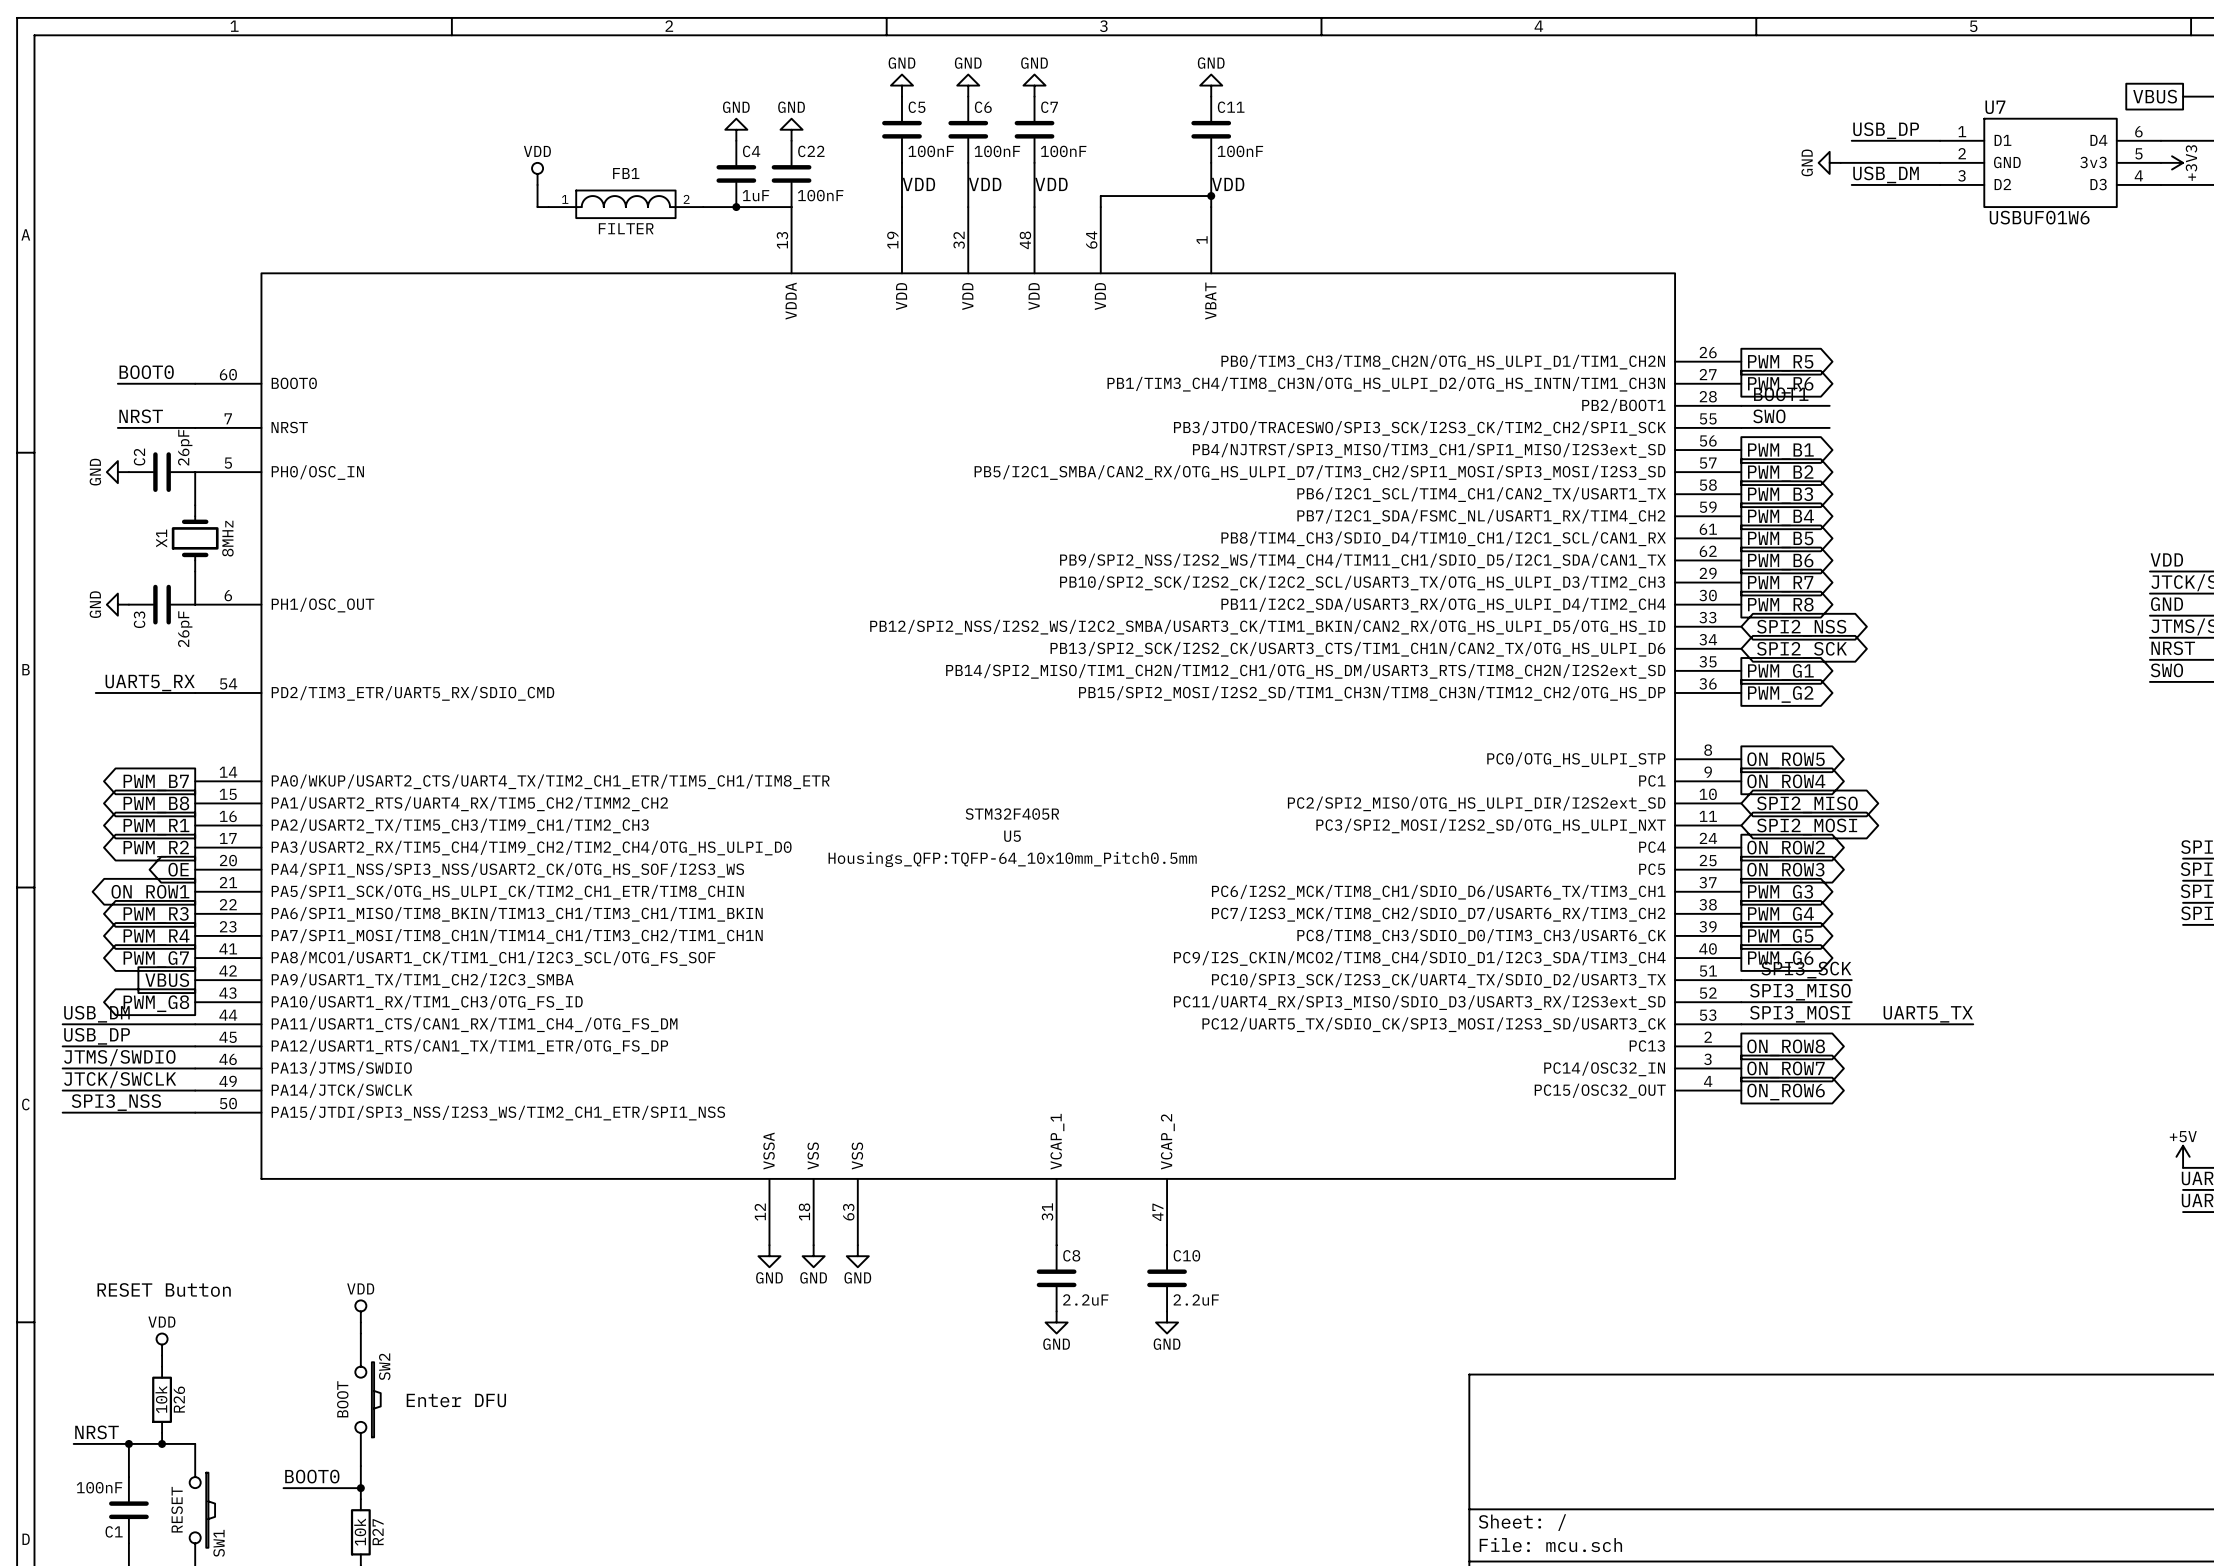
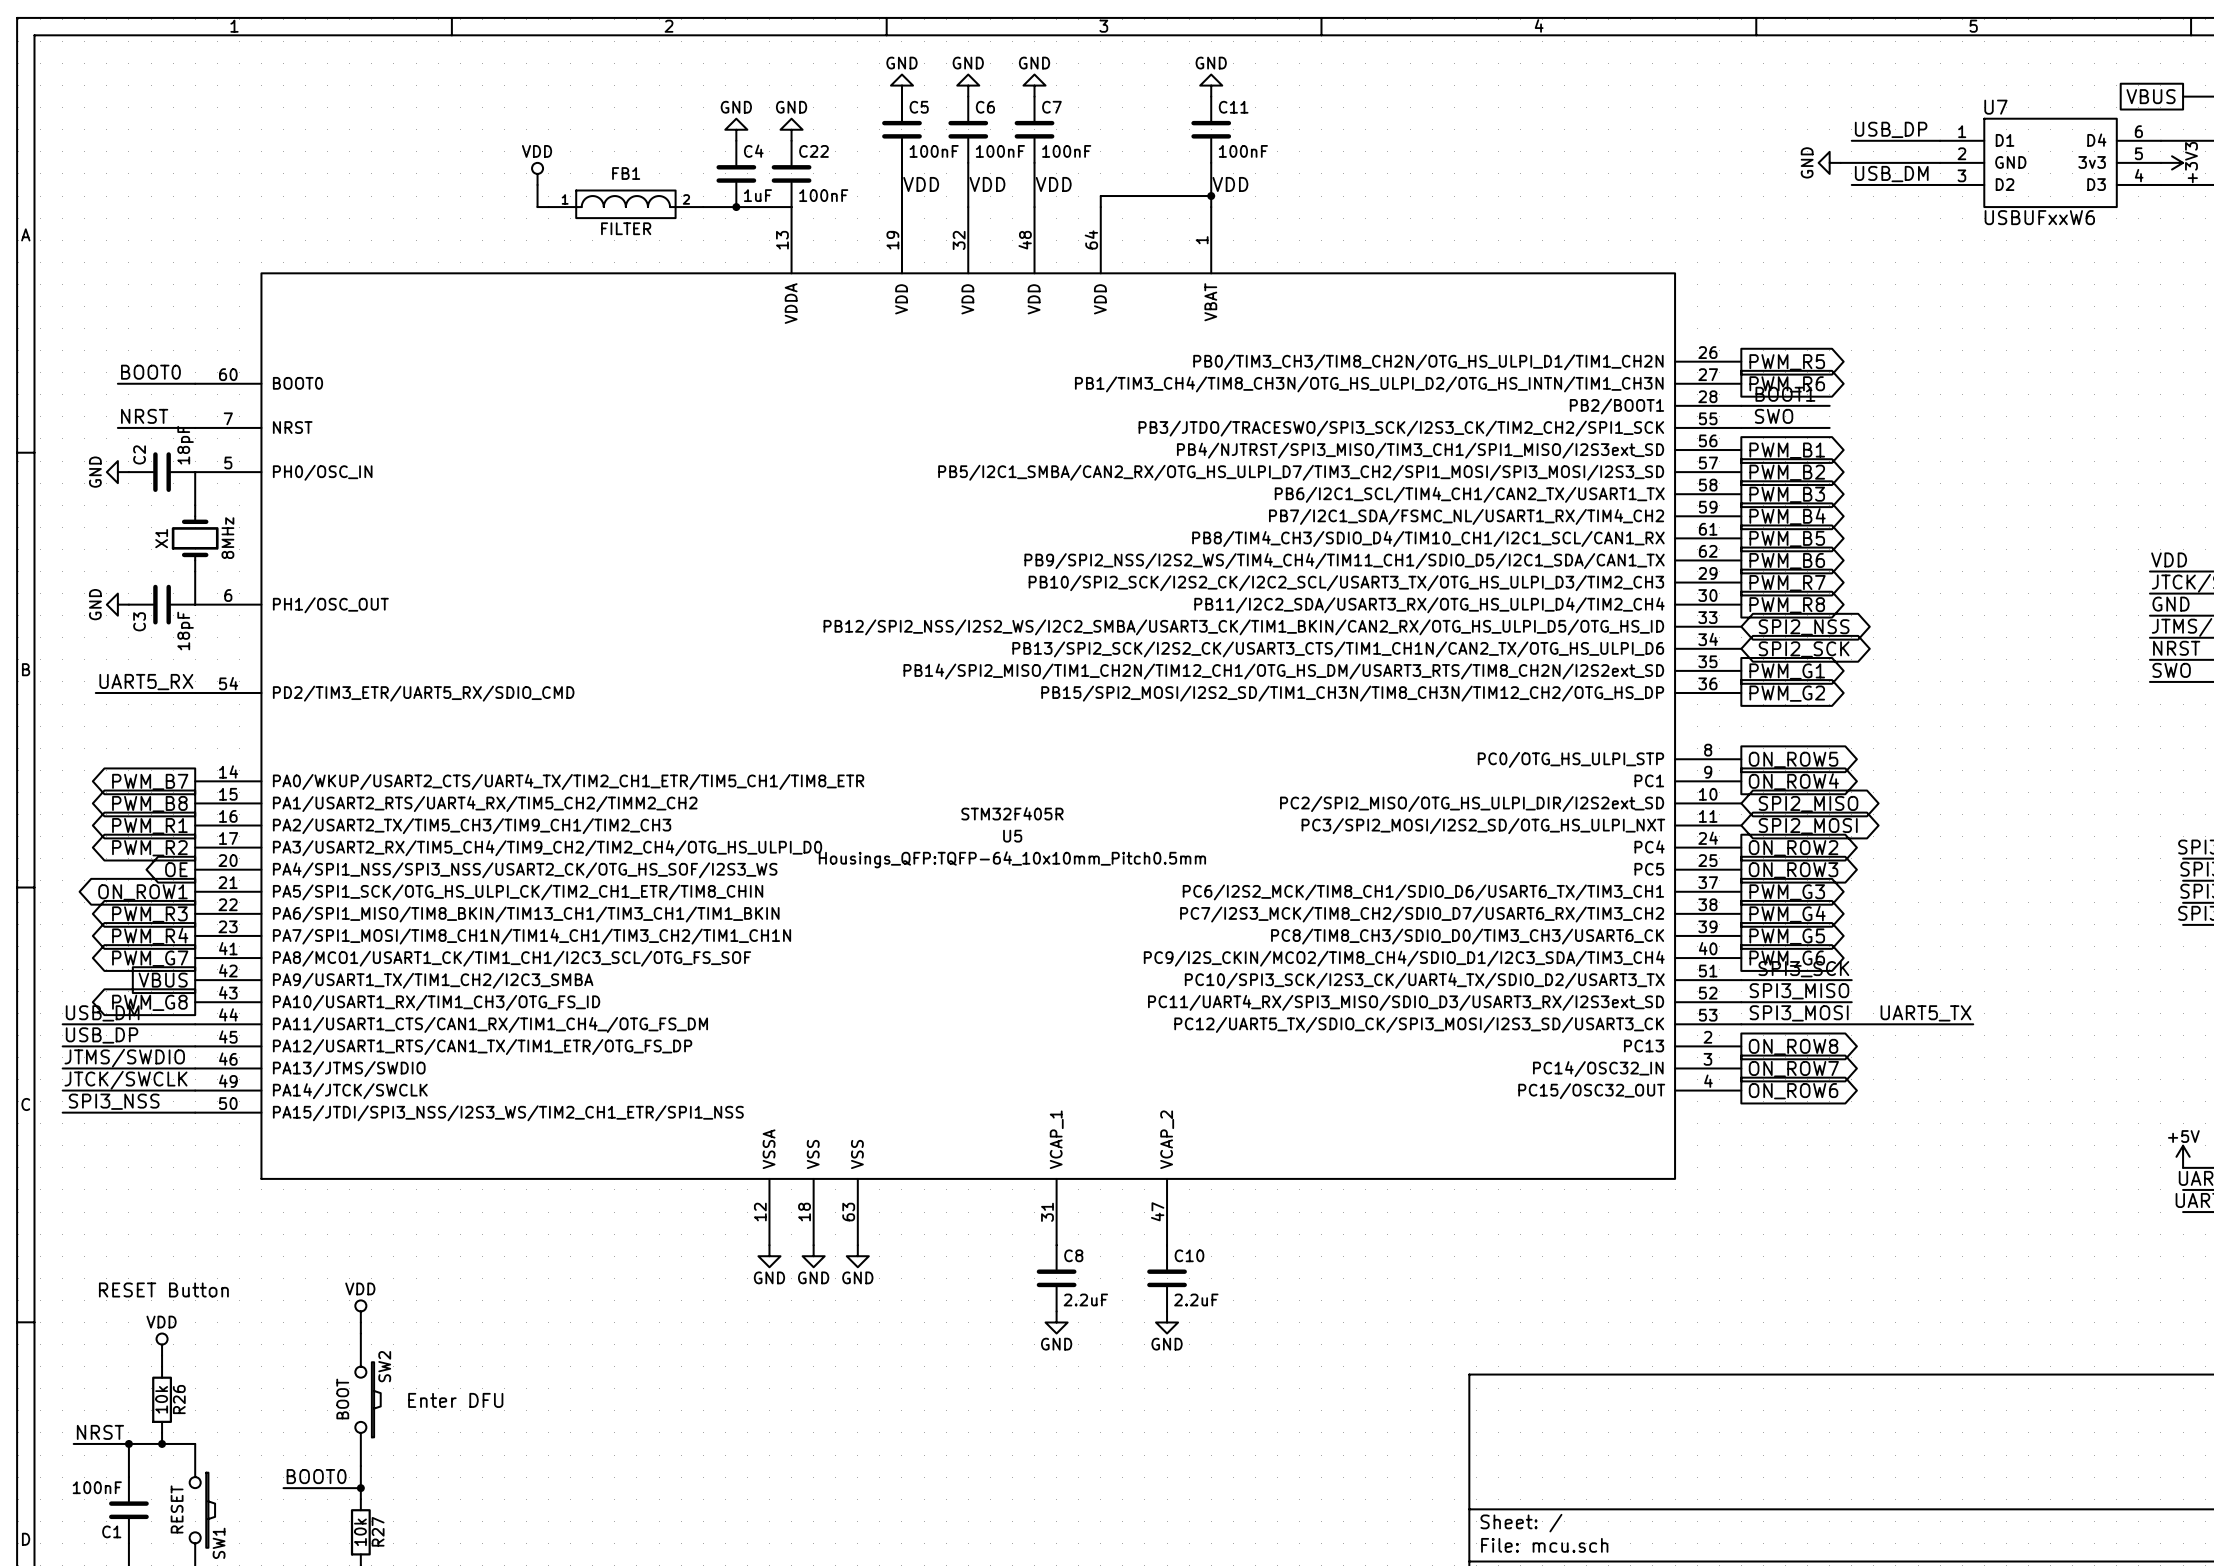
U7 value: USBUF01W6 (2039, 217) -> USBUFxxW6 (2039, 217)
C2 value: 26pF (185, 447) -> 18pF (185, 445)
C3 value: 26pF (185, 629) -> 18pF (185, 631)

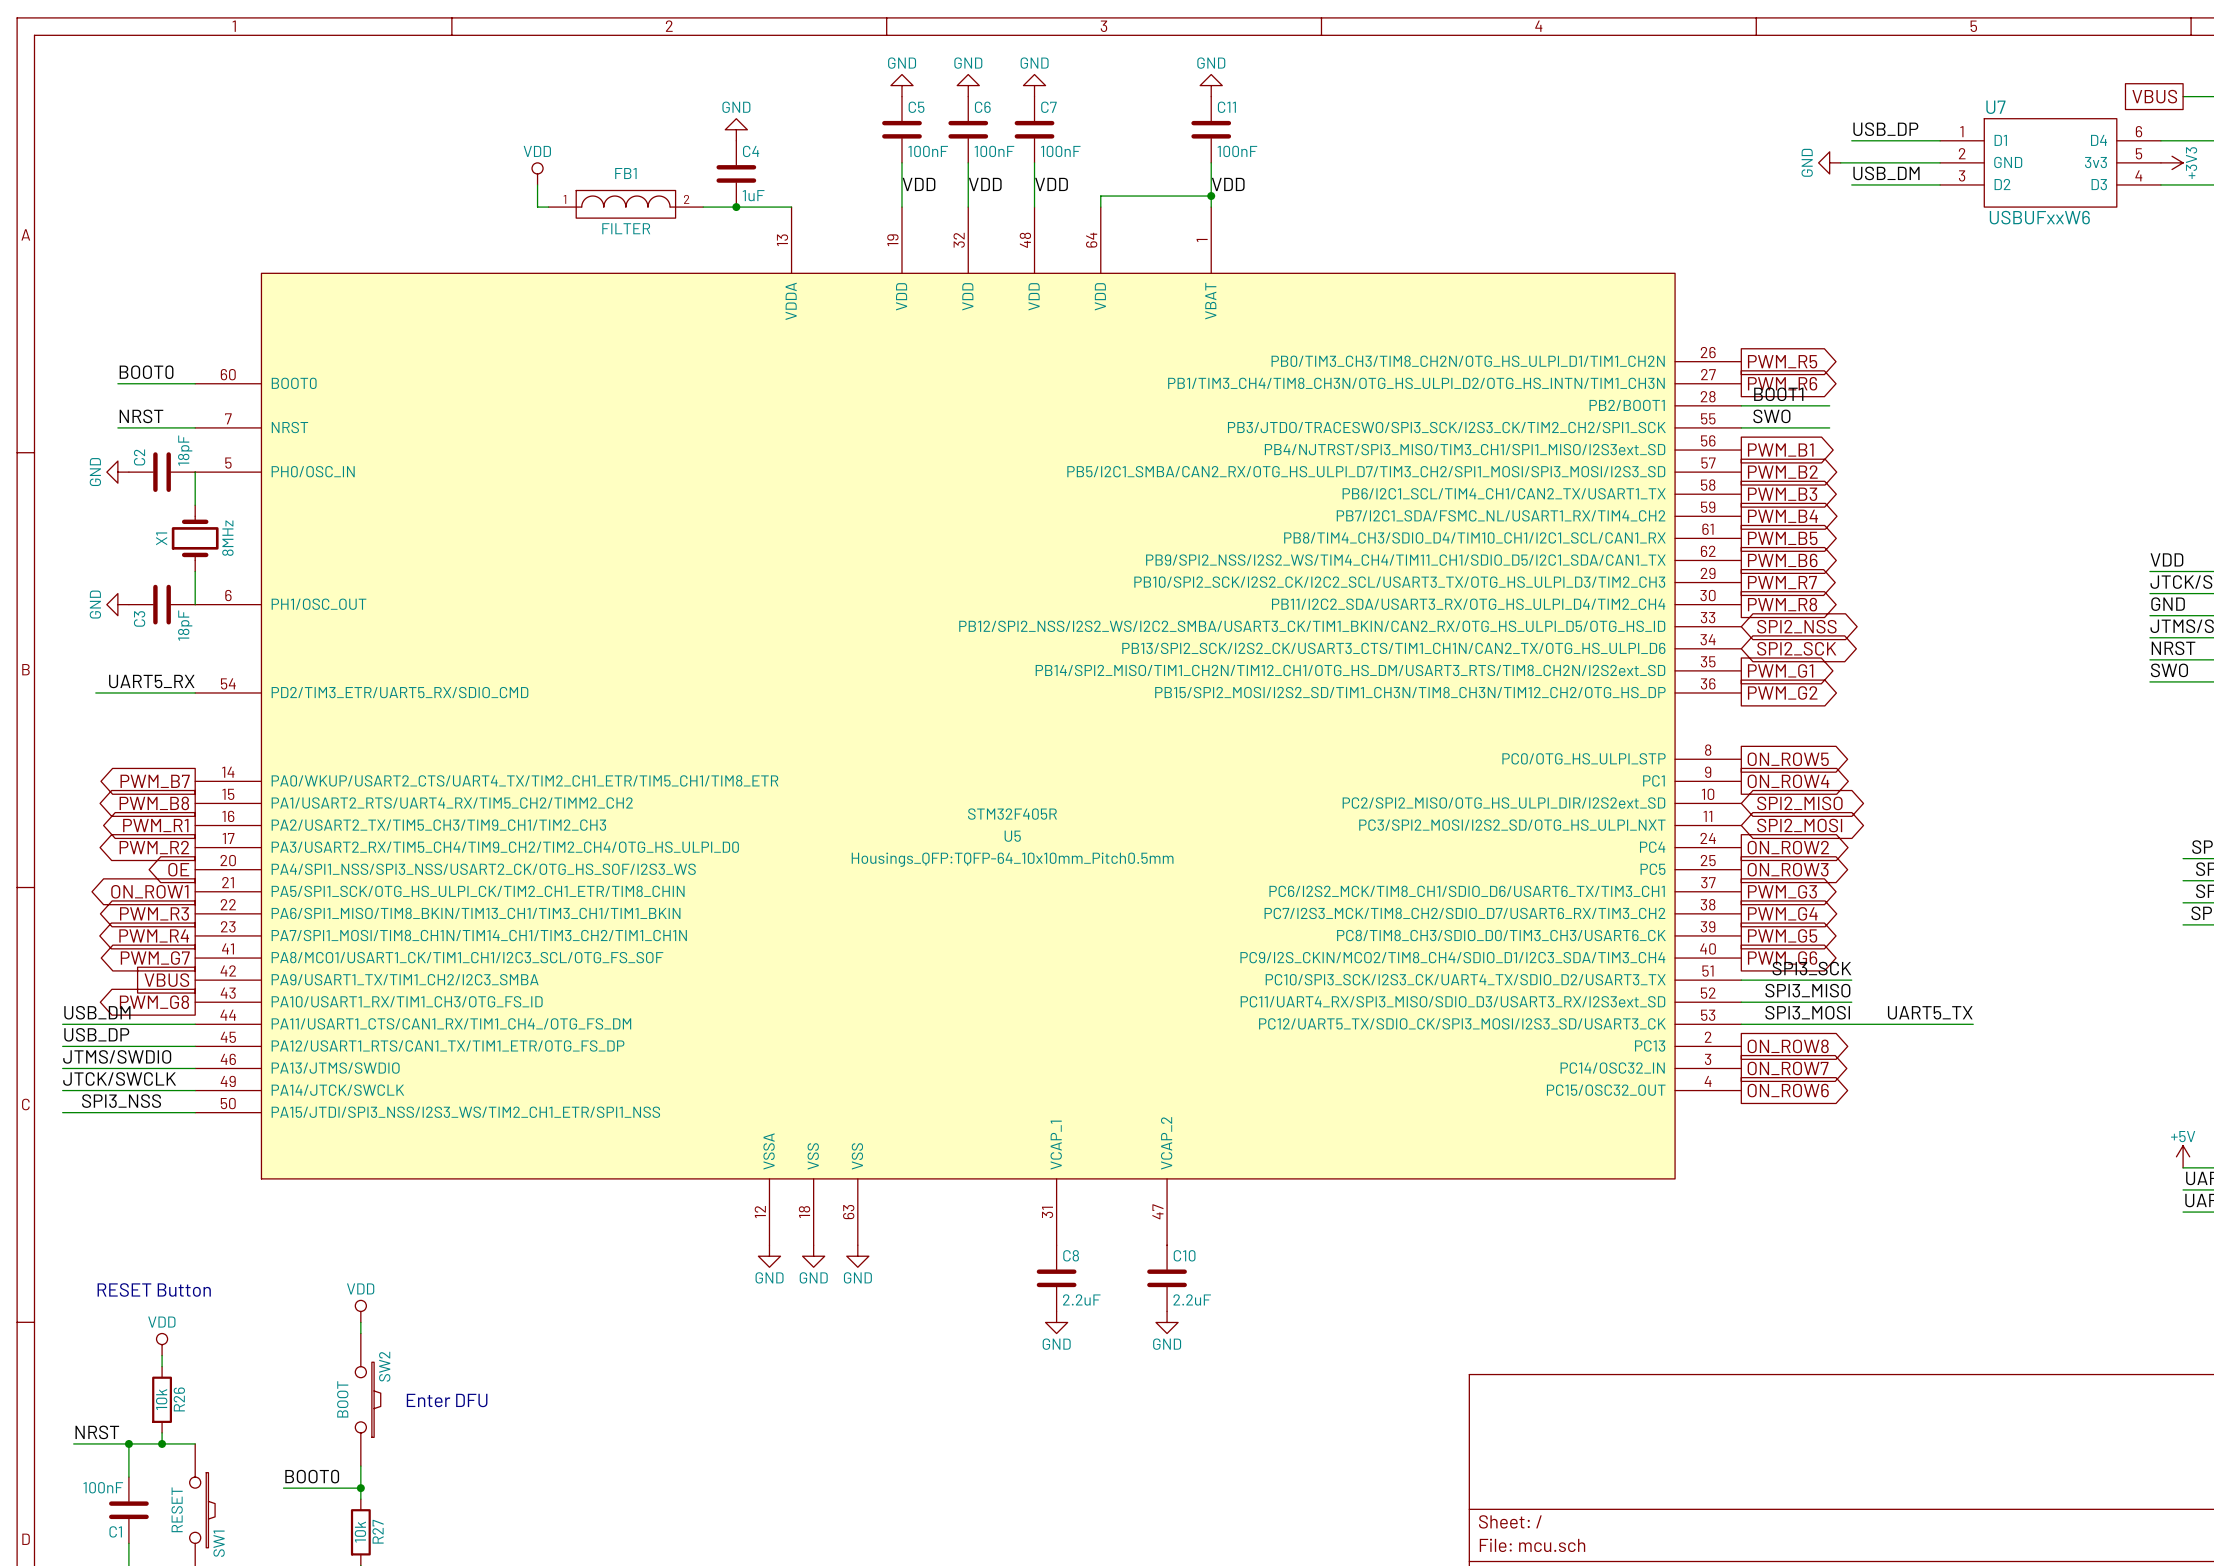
power symbol: GND (791, 129) -> none
C22: 100nF (791, 173) -> none

